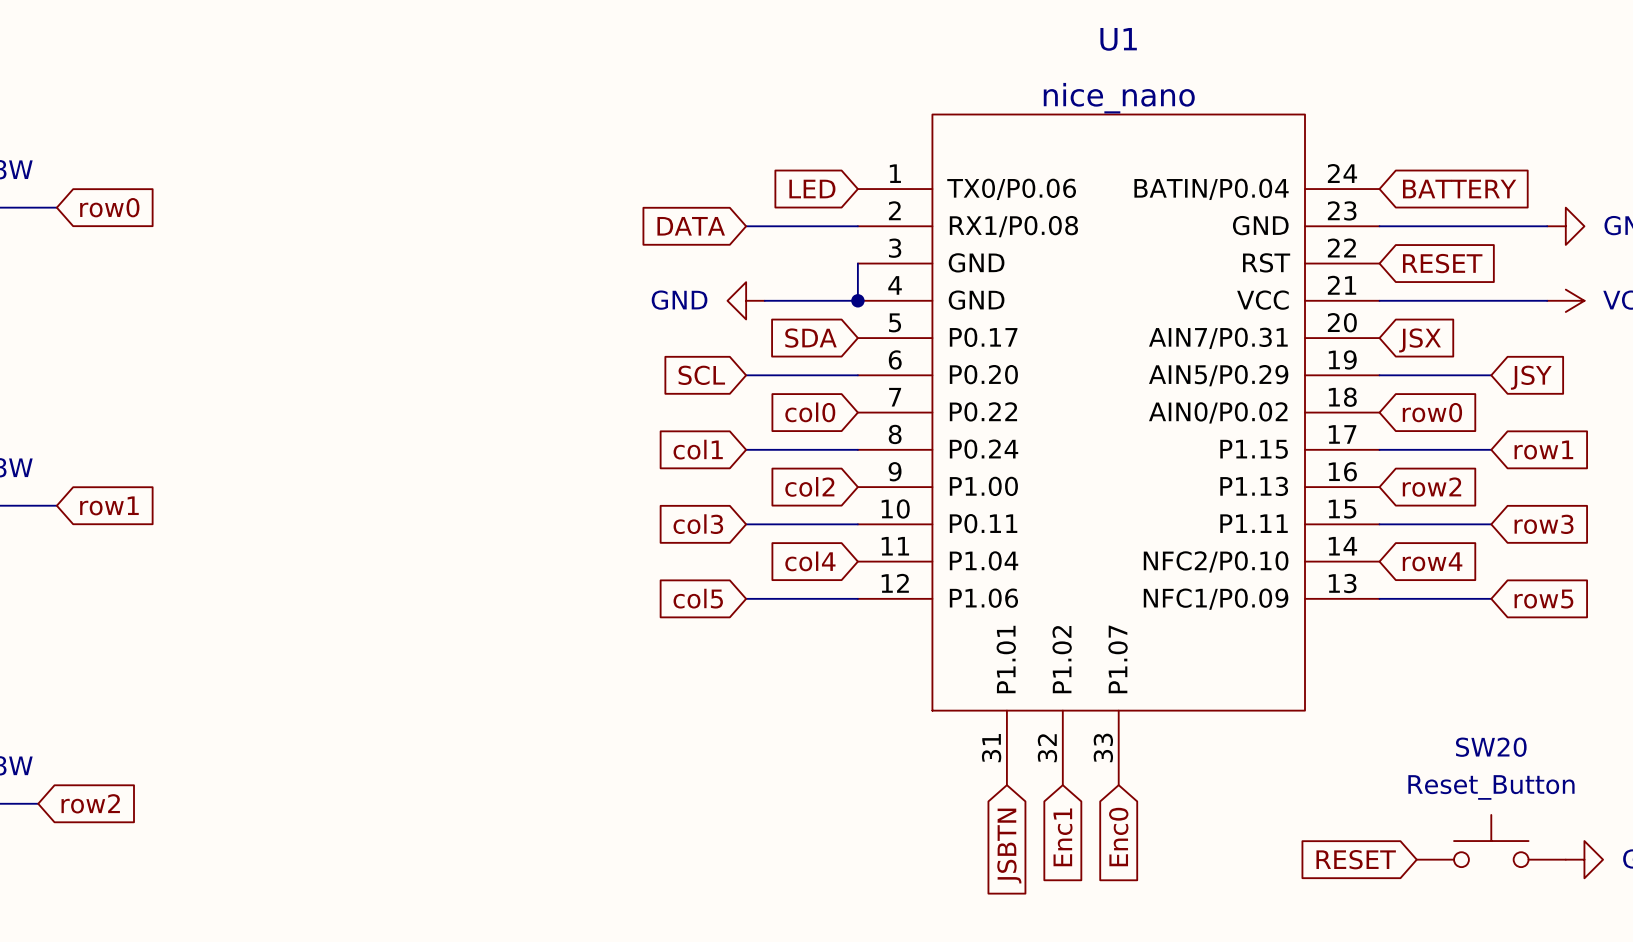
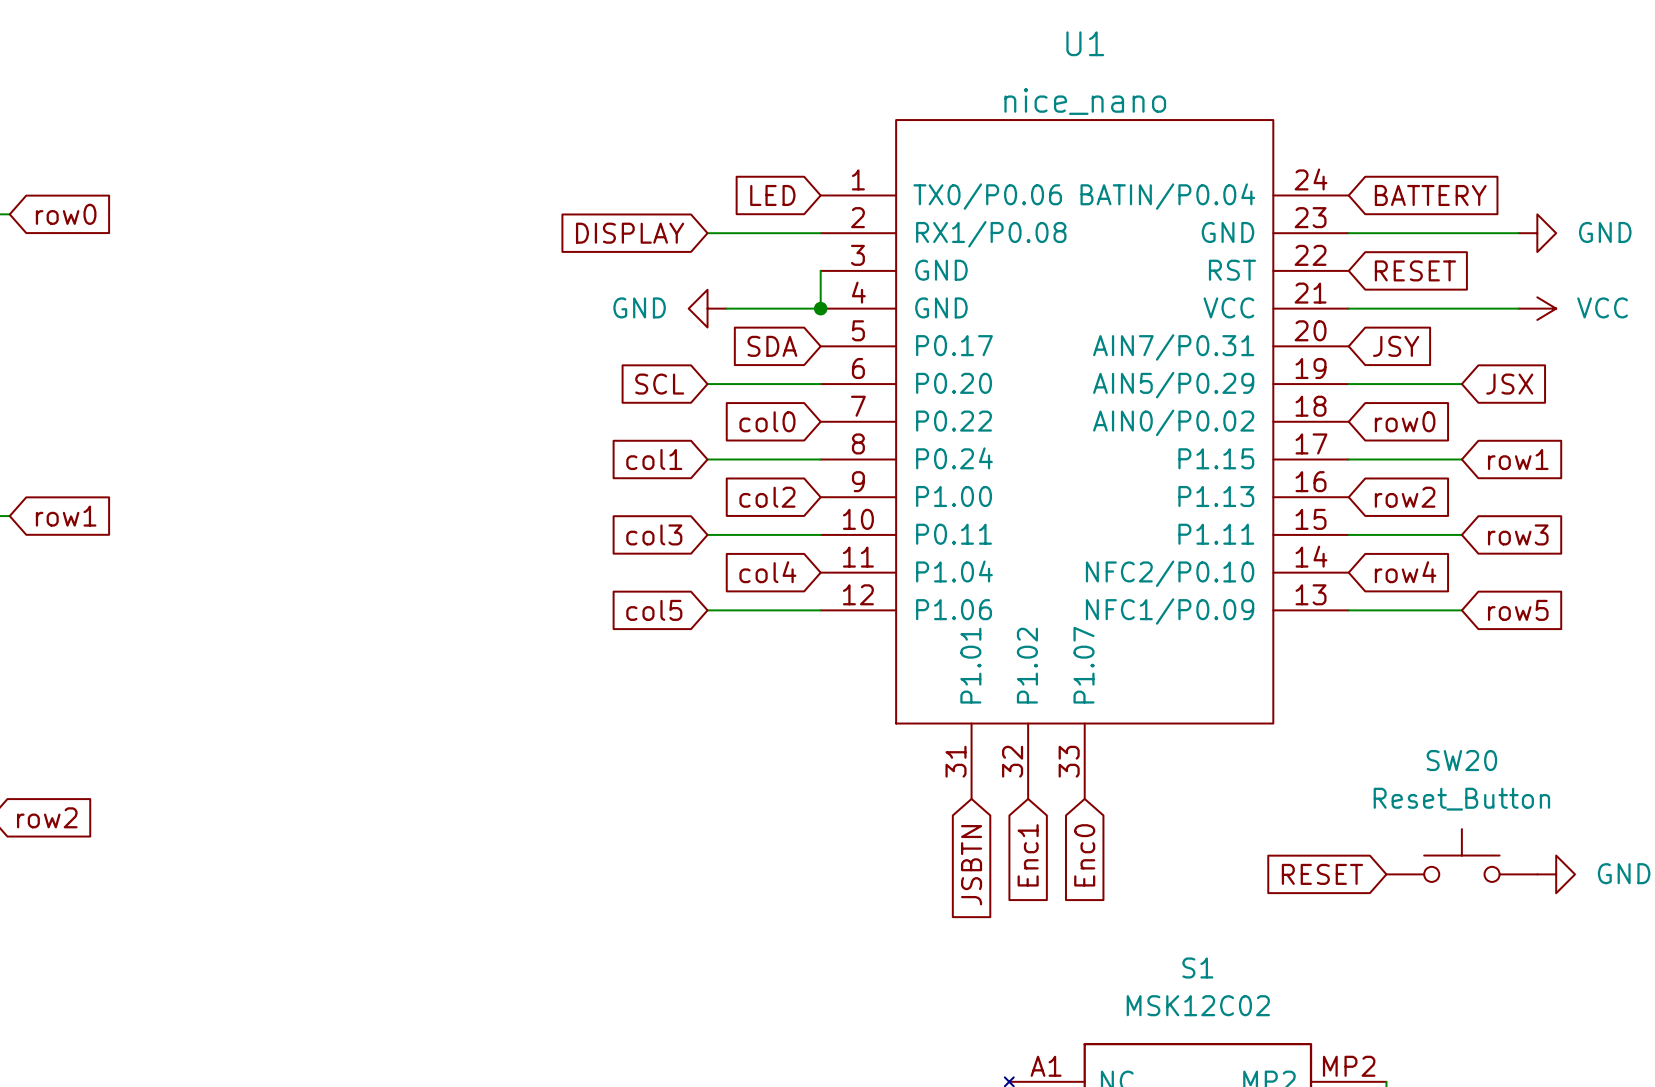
global label: DATA (691, 226) -> DISPLAY (630, 233)
global label: JSX (1420, 340) -> JSY (1396, 346)
global label: JSY (1531, 377) -> JSX (1509, 384)

